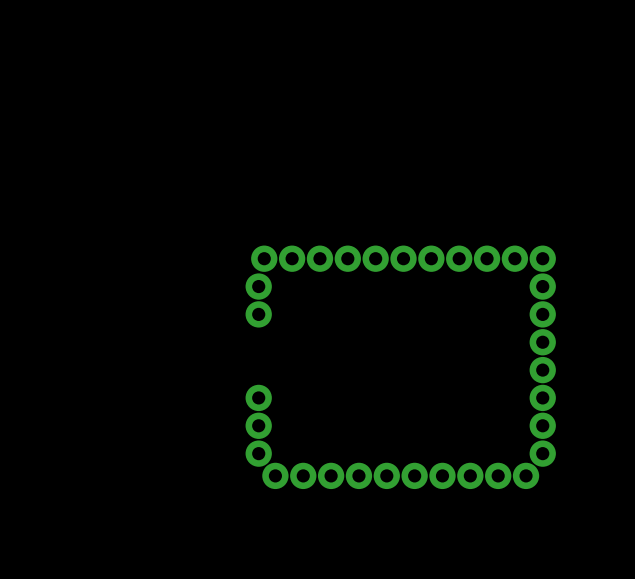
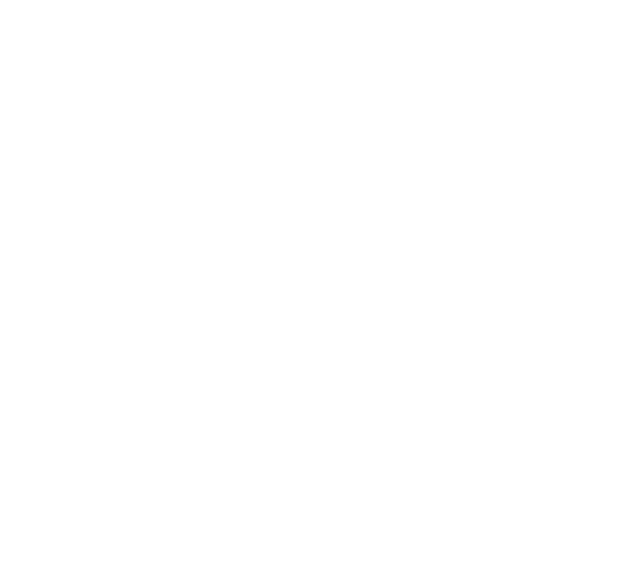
part: (264, 258) -> none
part: (292, 258) -> none
part: (319, 258) -> none
part: (347, 258) -> none
part: (375, 258) -> none
part: (403, 258) -> none
part: (431, 258) -> none
part: (459, 258) -> none
part: (487, 258) -> none
part: (514, 258) -> none
part: (542, 258) -> none
part: (258, 286) -> none
part: (542, 286) -> none
part: (258, 314) -> none
part: (542, 314) -> none
part: (542, 342) -> none
part: (542, 370) -> none
part: (258, 397) -> none
part: (542, 397) -> none
part: (258, 425) -> none
part: (542, 425) -> none
part: (258, 453) -> none
part: (542, 453) -> none
part: (275, 475) -> none
part: (303, 475) -> none
part: (331, 475) -> none
part: (358, 475) -> none
part: (386, 475) -> none
part: (414, 475) -> none
part: (442, 475) -> none
part: (470, 475) -> none
part: (498, 475) -> none
part: (526, 475) -> none

